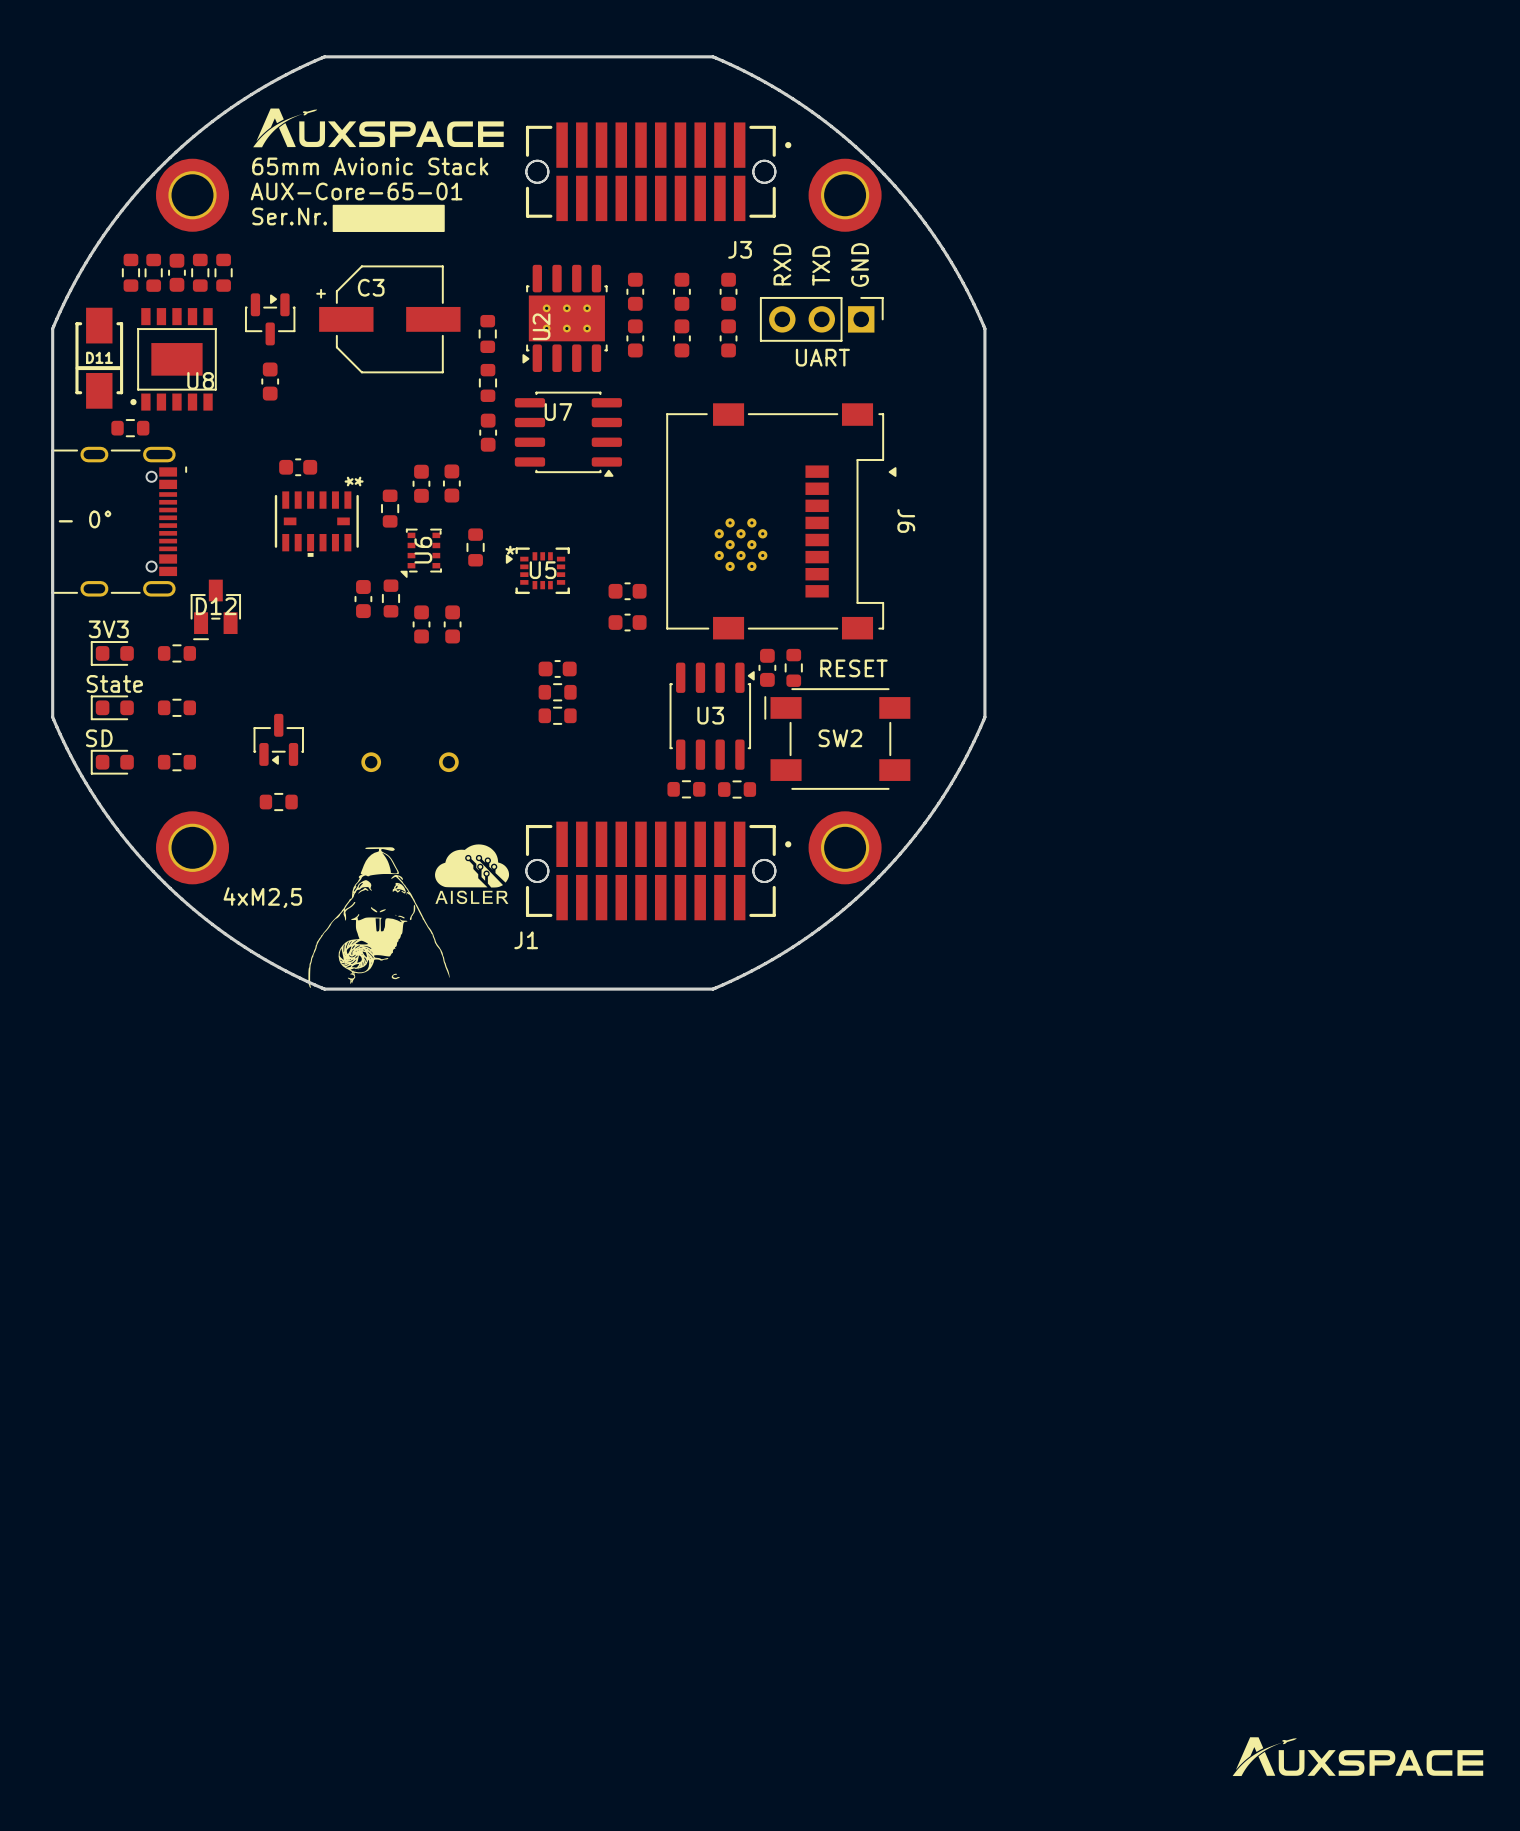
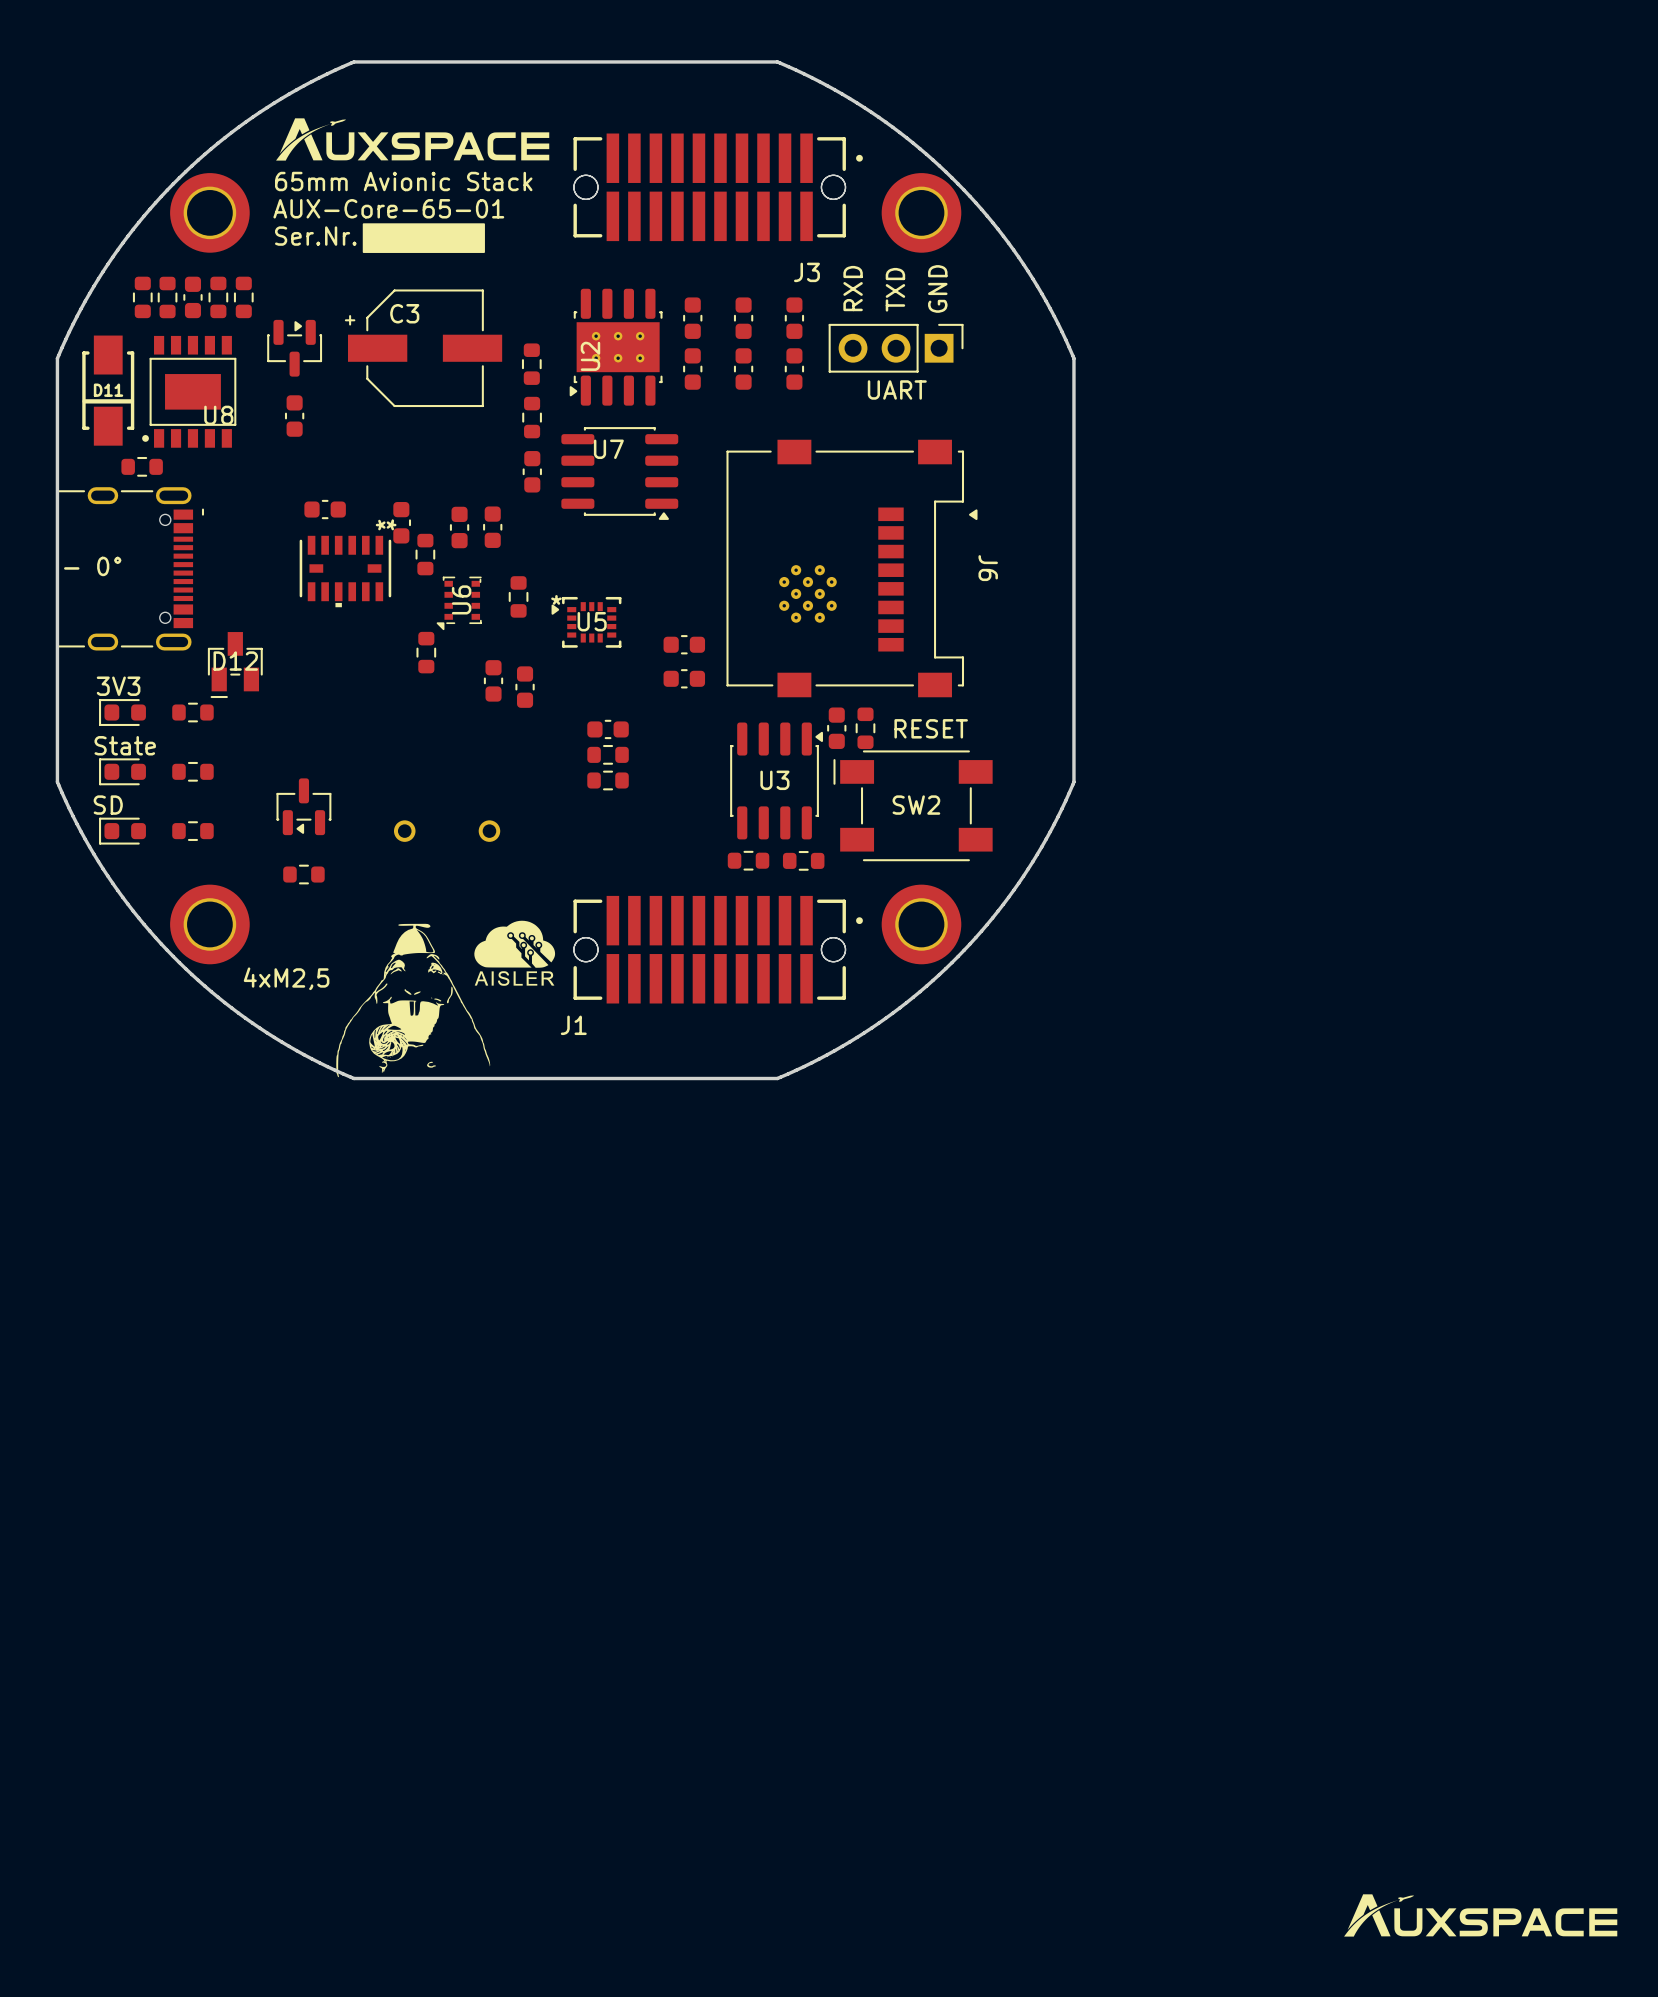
part: none -> (401, 522)
part: (363, 599) -> none
part position: (421, 624) -> (525, 687)

